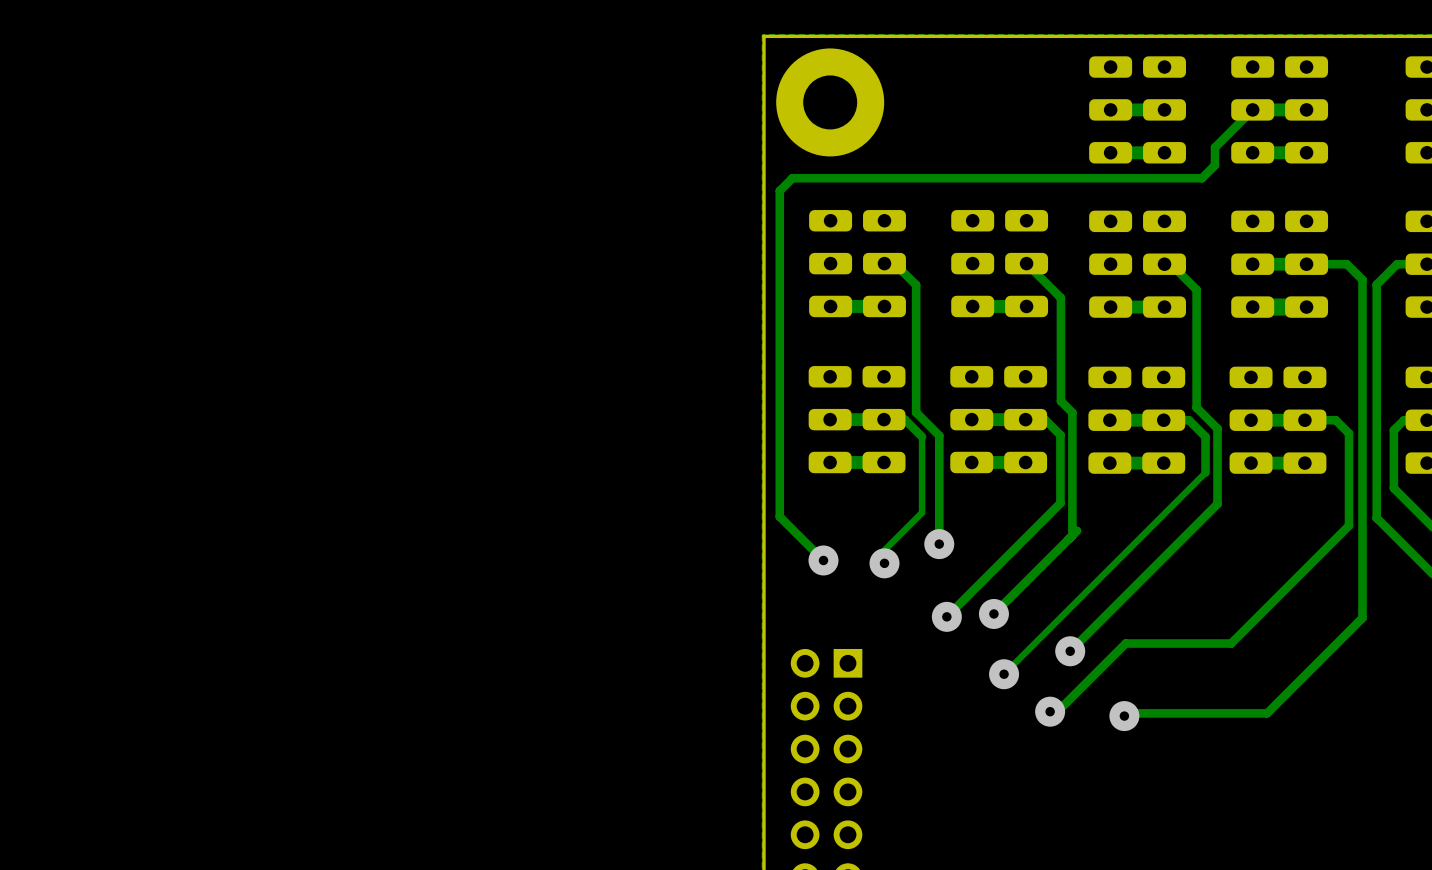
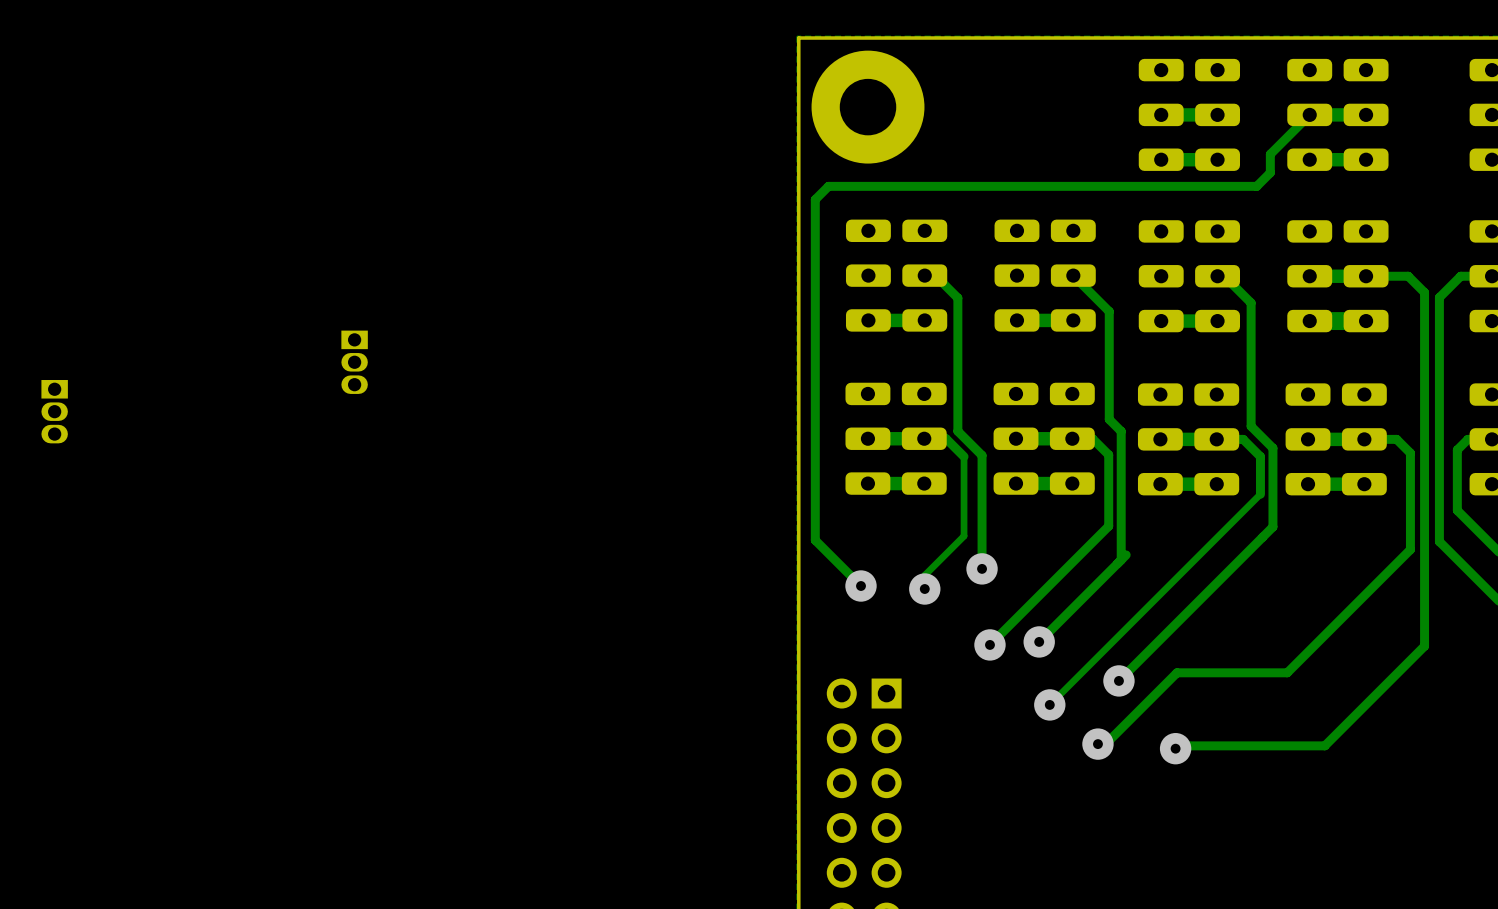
part: none -> (354, 362)
part: none -> (54, 411)

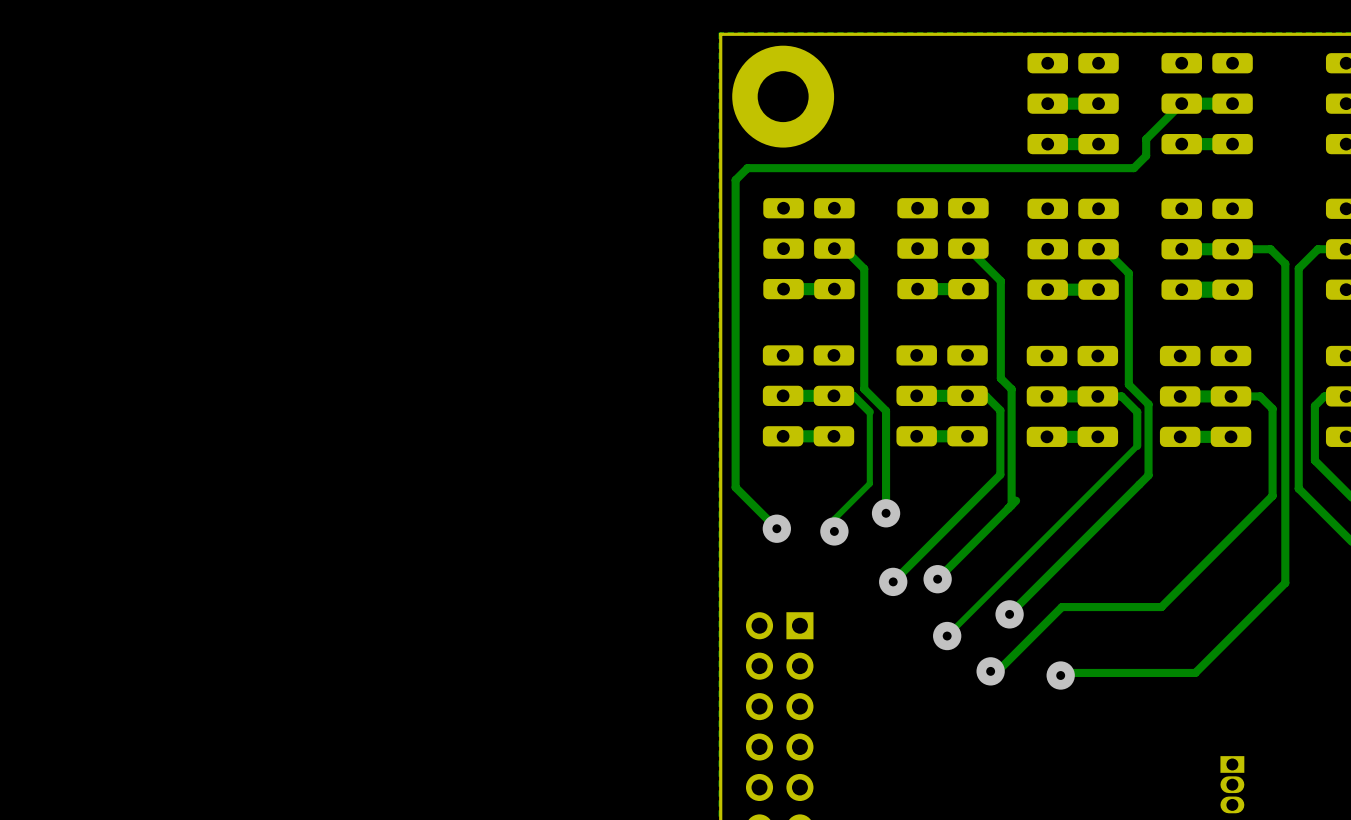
part: (354, 362) -> none
part: (54, 411) -> none
part: none -> (1232, 784)

